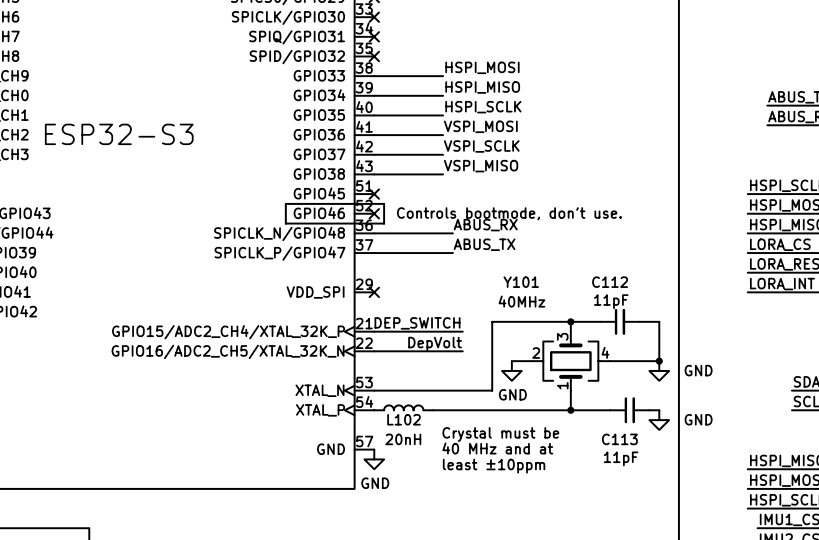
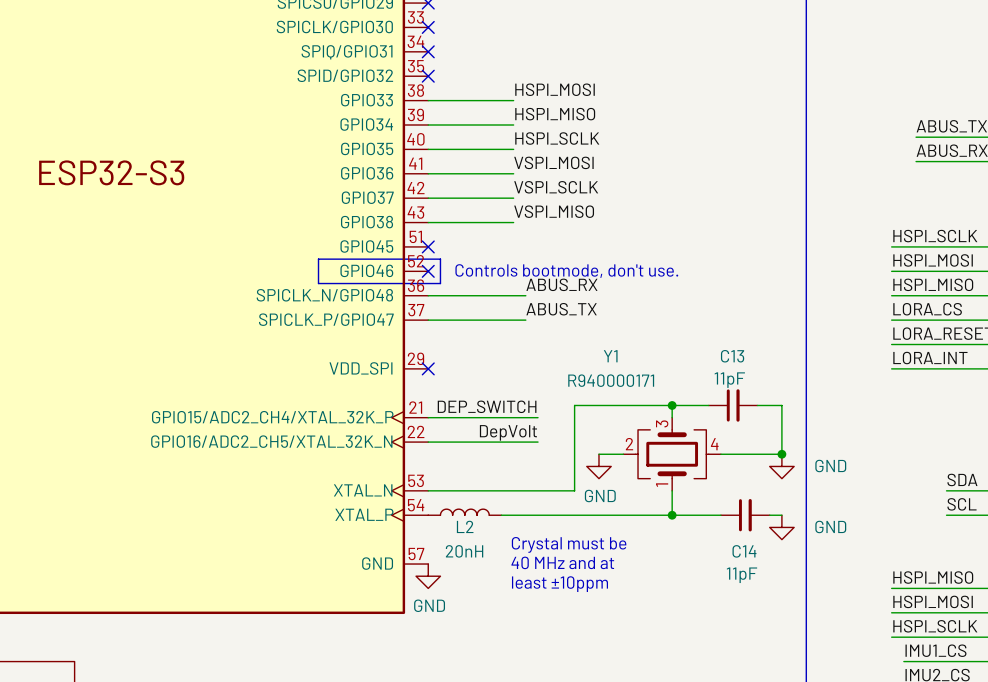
Y101 name: Y101 (521, 282) -> Y1 (610, 356)
C112 name: C112 (610, 282) -> C13 (732, 356)
Y101 value: 40MHz (521, 301) -> R940000171 (611, 380)
L102 name: L102 (404, 419) -> L2 (465, 526)
C113 name: C113 (619, 439) -> C14 (744, 551)

